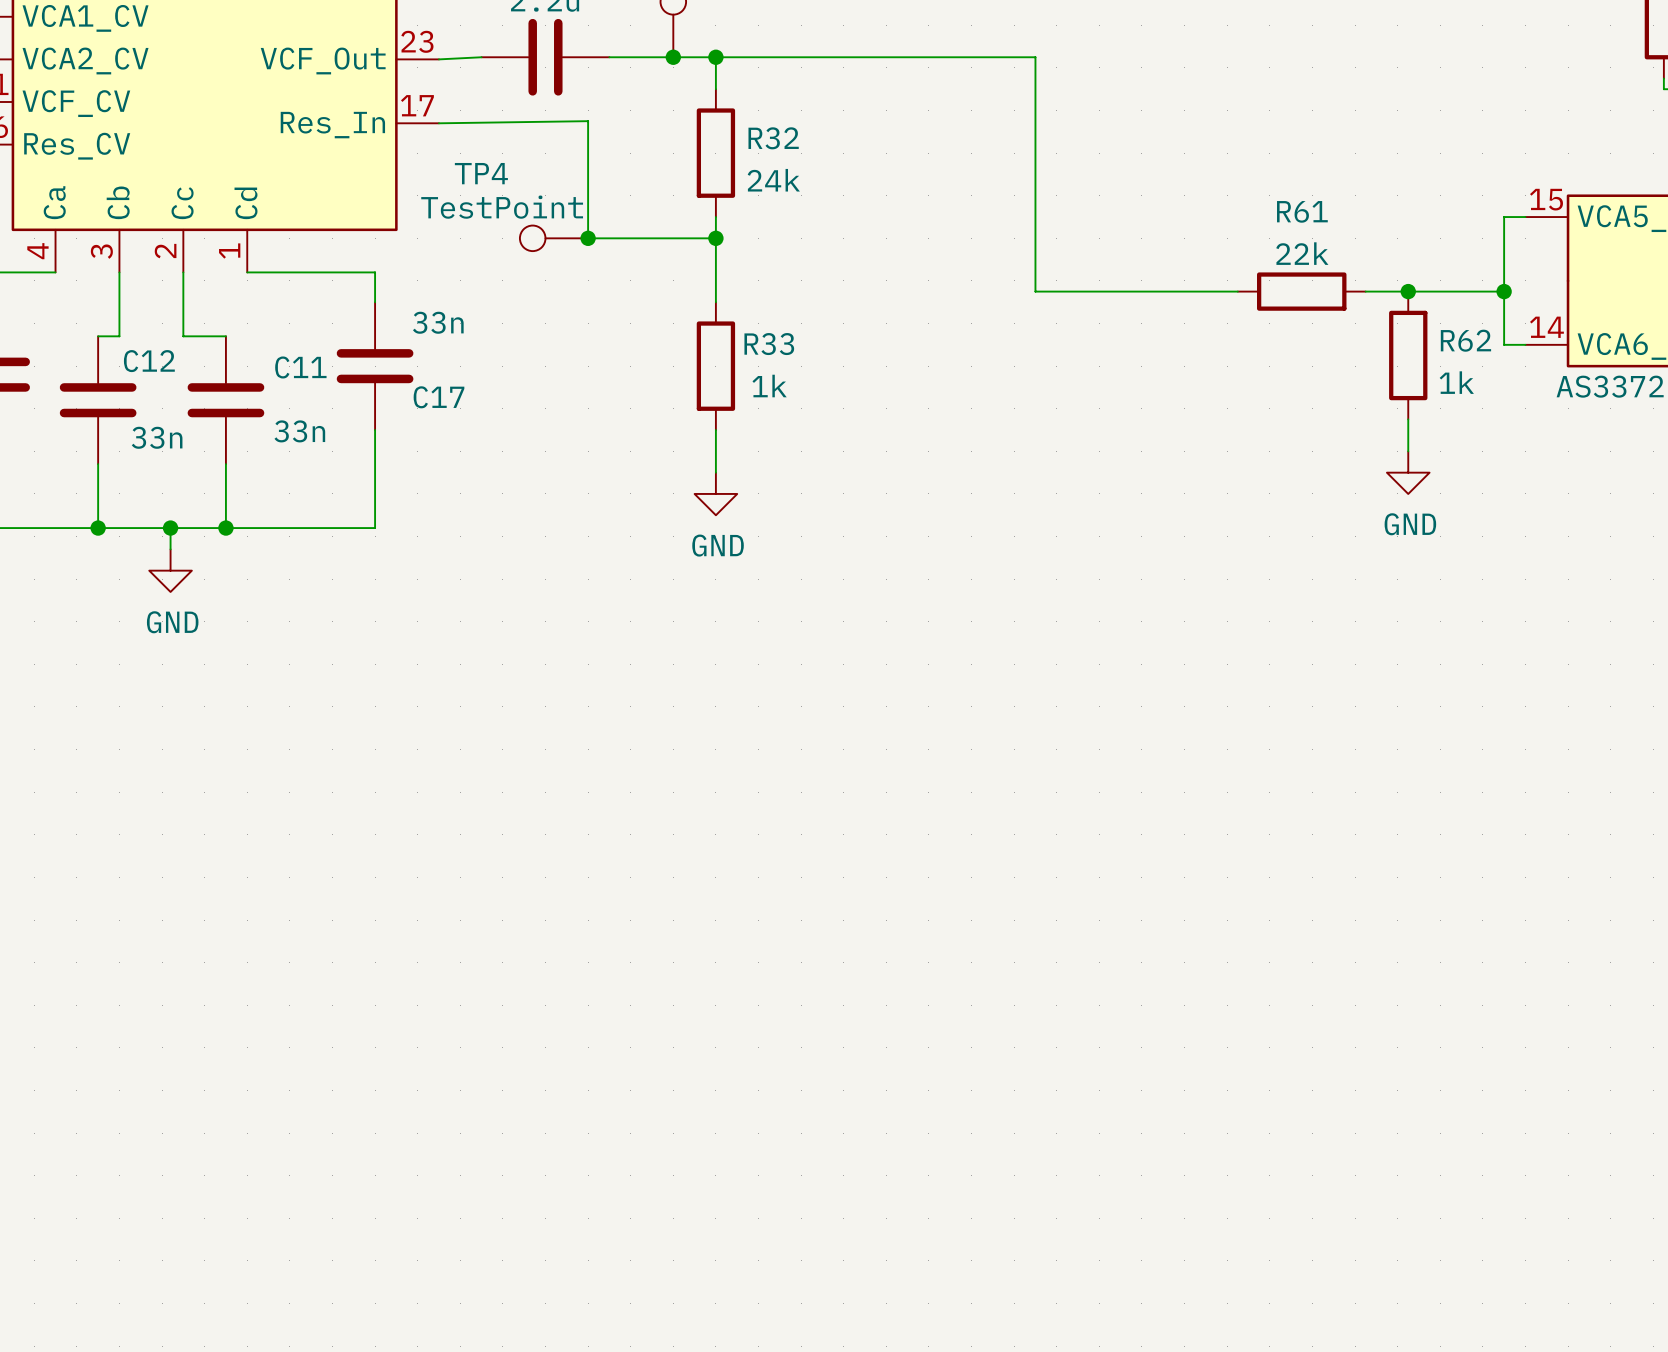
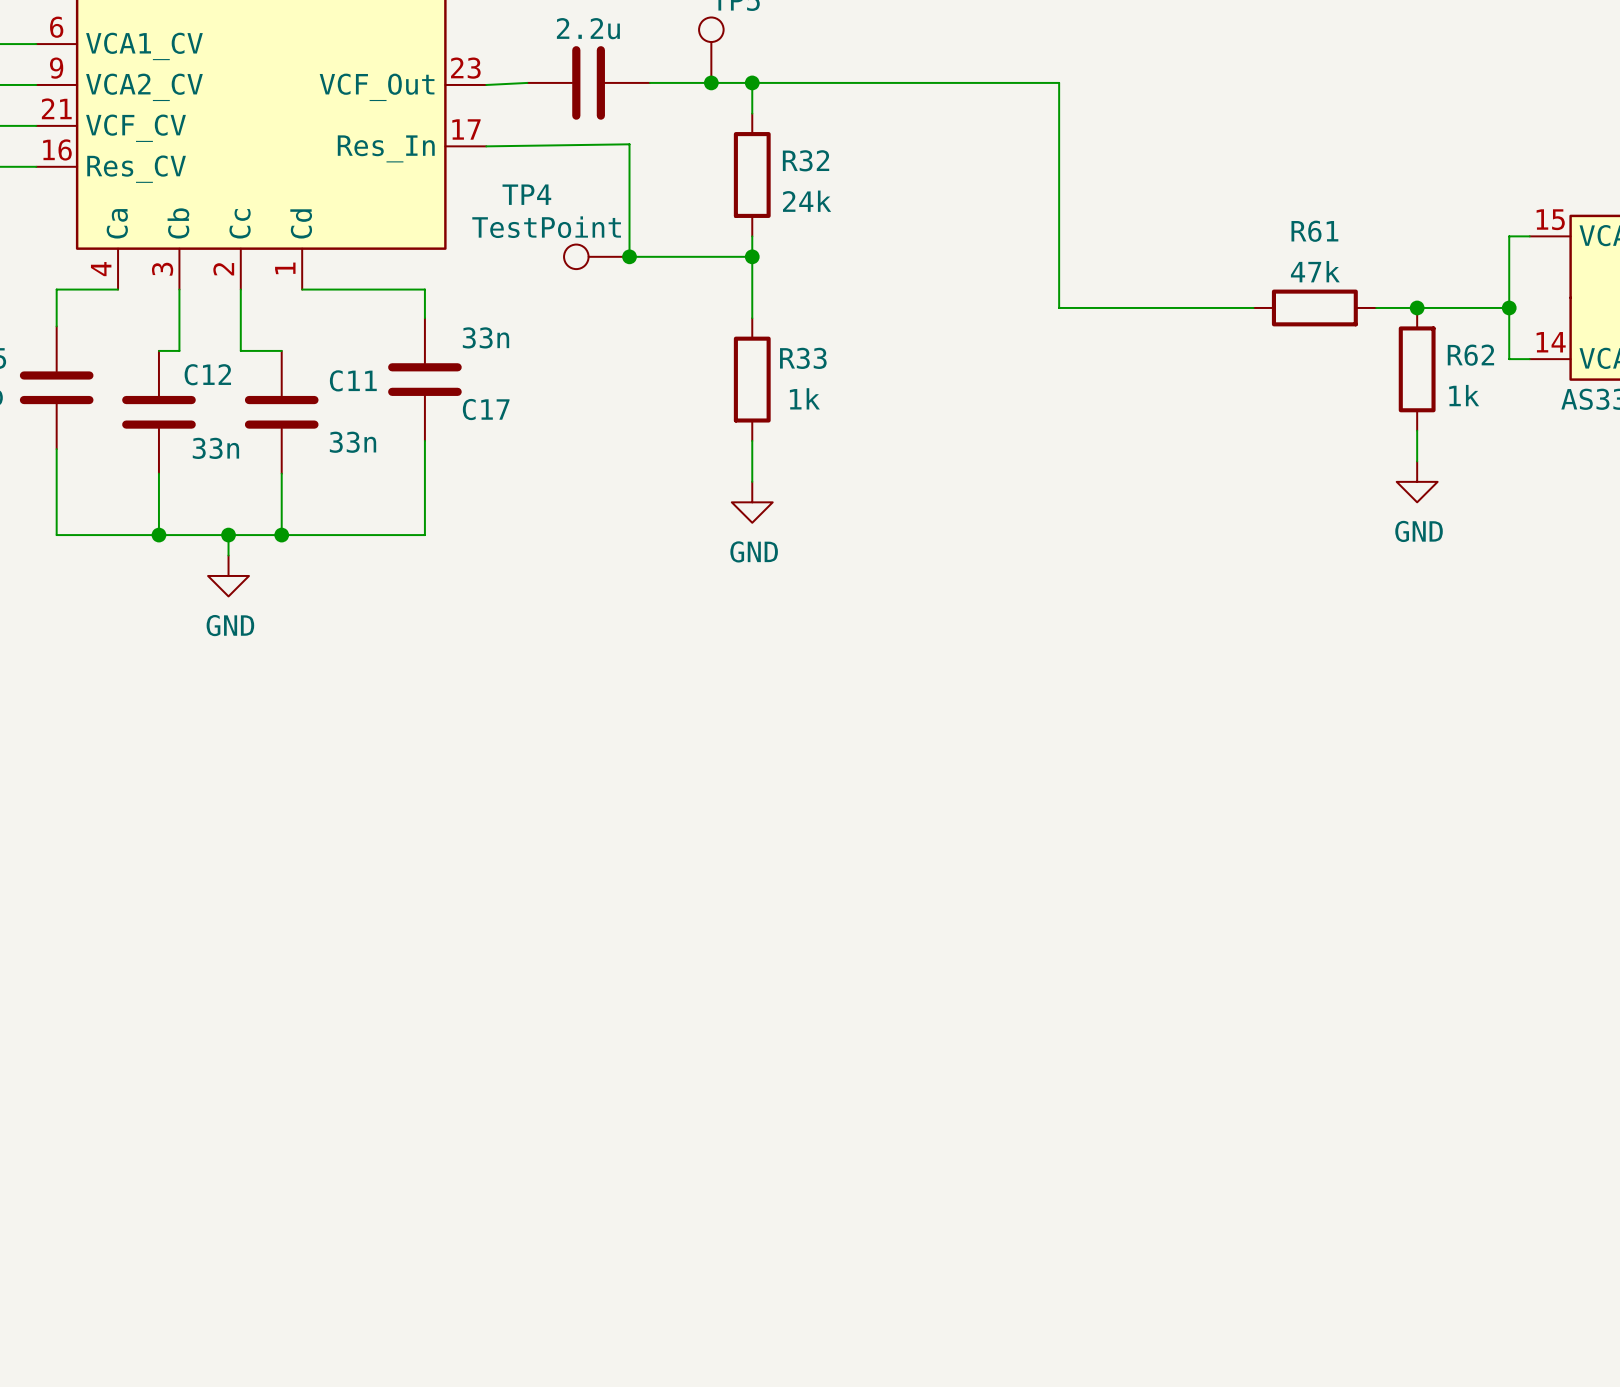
R61 value: 22k (1302, 253) -> 47k (1315, 271)

